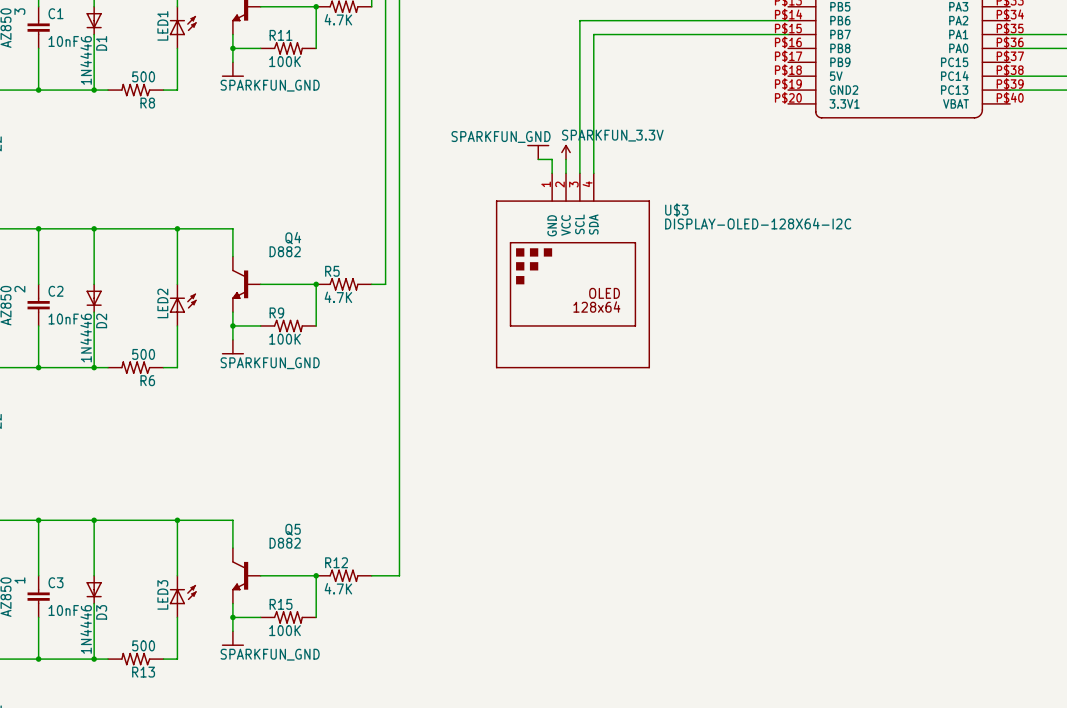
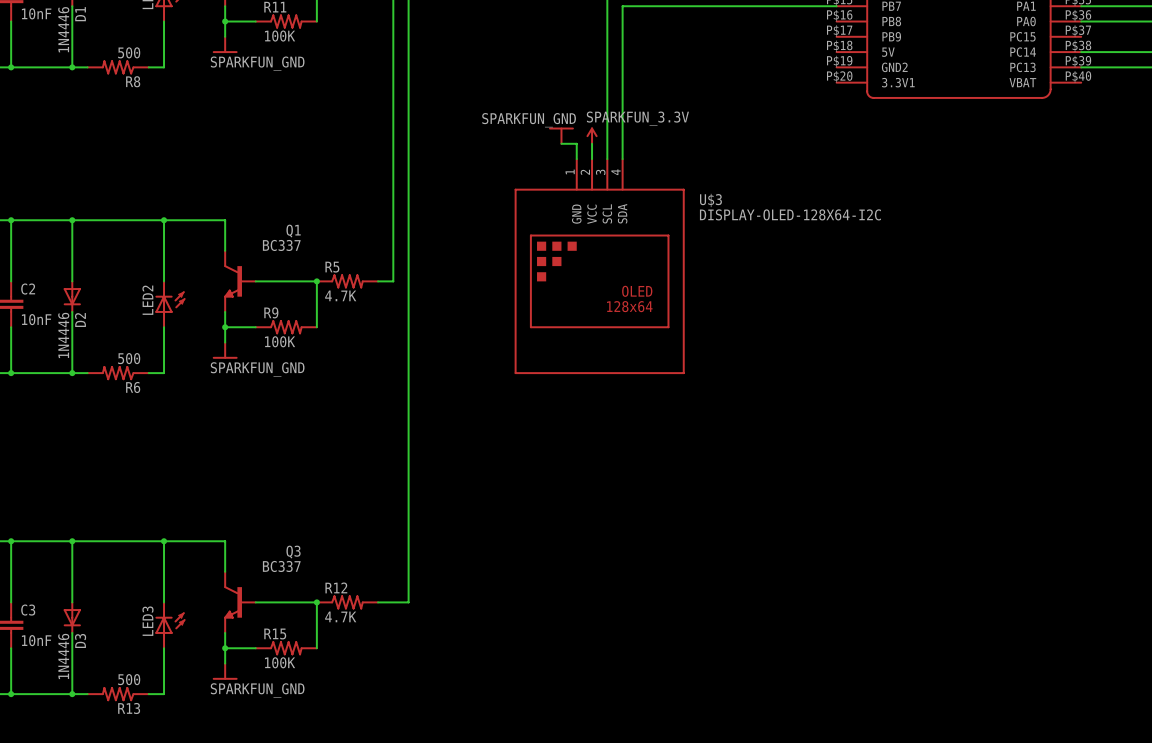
Q4 name: Q4 (293, 238) -> Q1 (293, 231)
Q4 value: D882 (285, 251) -> BC337 (281, 245)
Q5 name: Q5 (293, 529) -> Q3 (293, 552)
Q5 value: D882 (285, 543) -> BC337 (281, 566)

